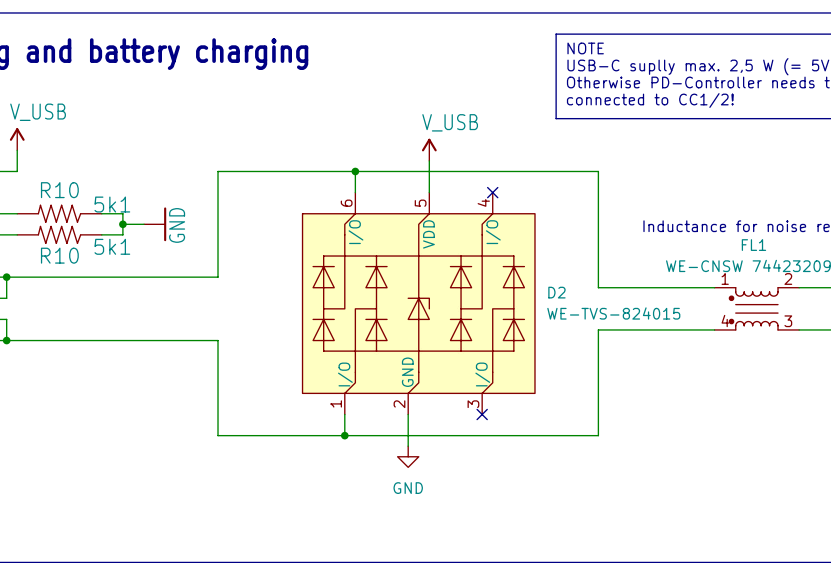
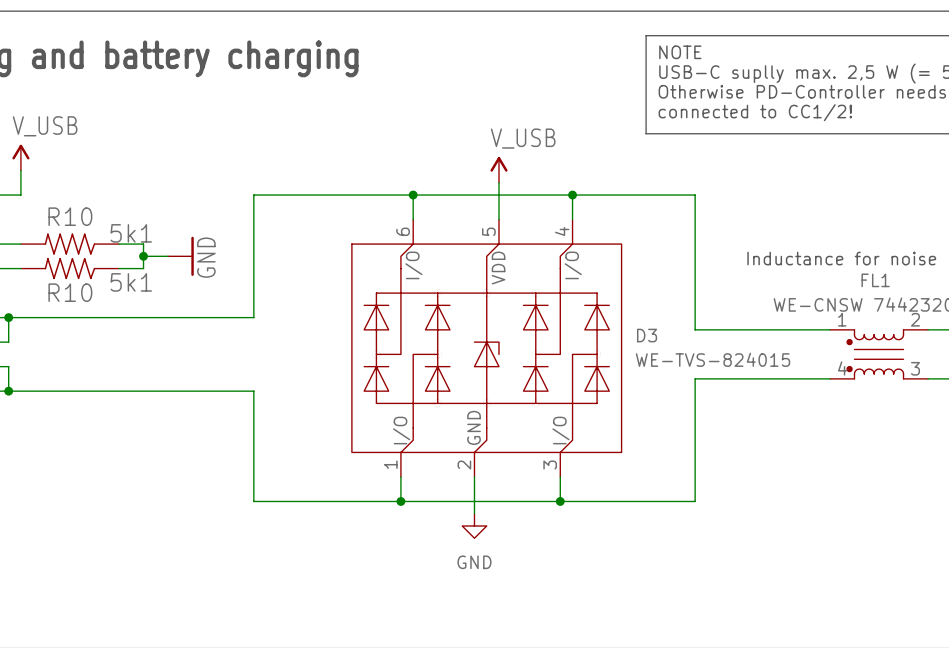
wire: none -> (572, 195) (572, 219)
junction: none -> (572, 195)
no-connect mark: (492, 192) -> none
D2 name: D2 (556, 292) -> D3 (647, 335)
wire: none -> (560, 476) (560, 501)
no-connect mark: (482, 414) -> none
junction: none -> (560, 501)

